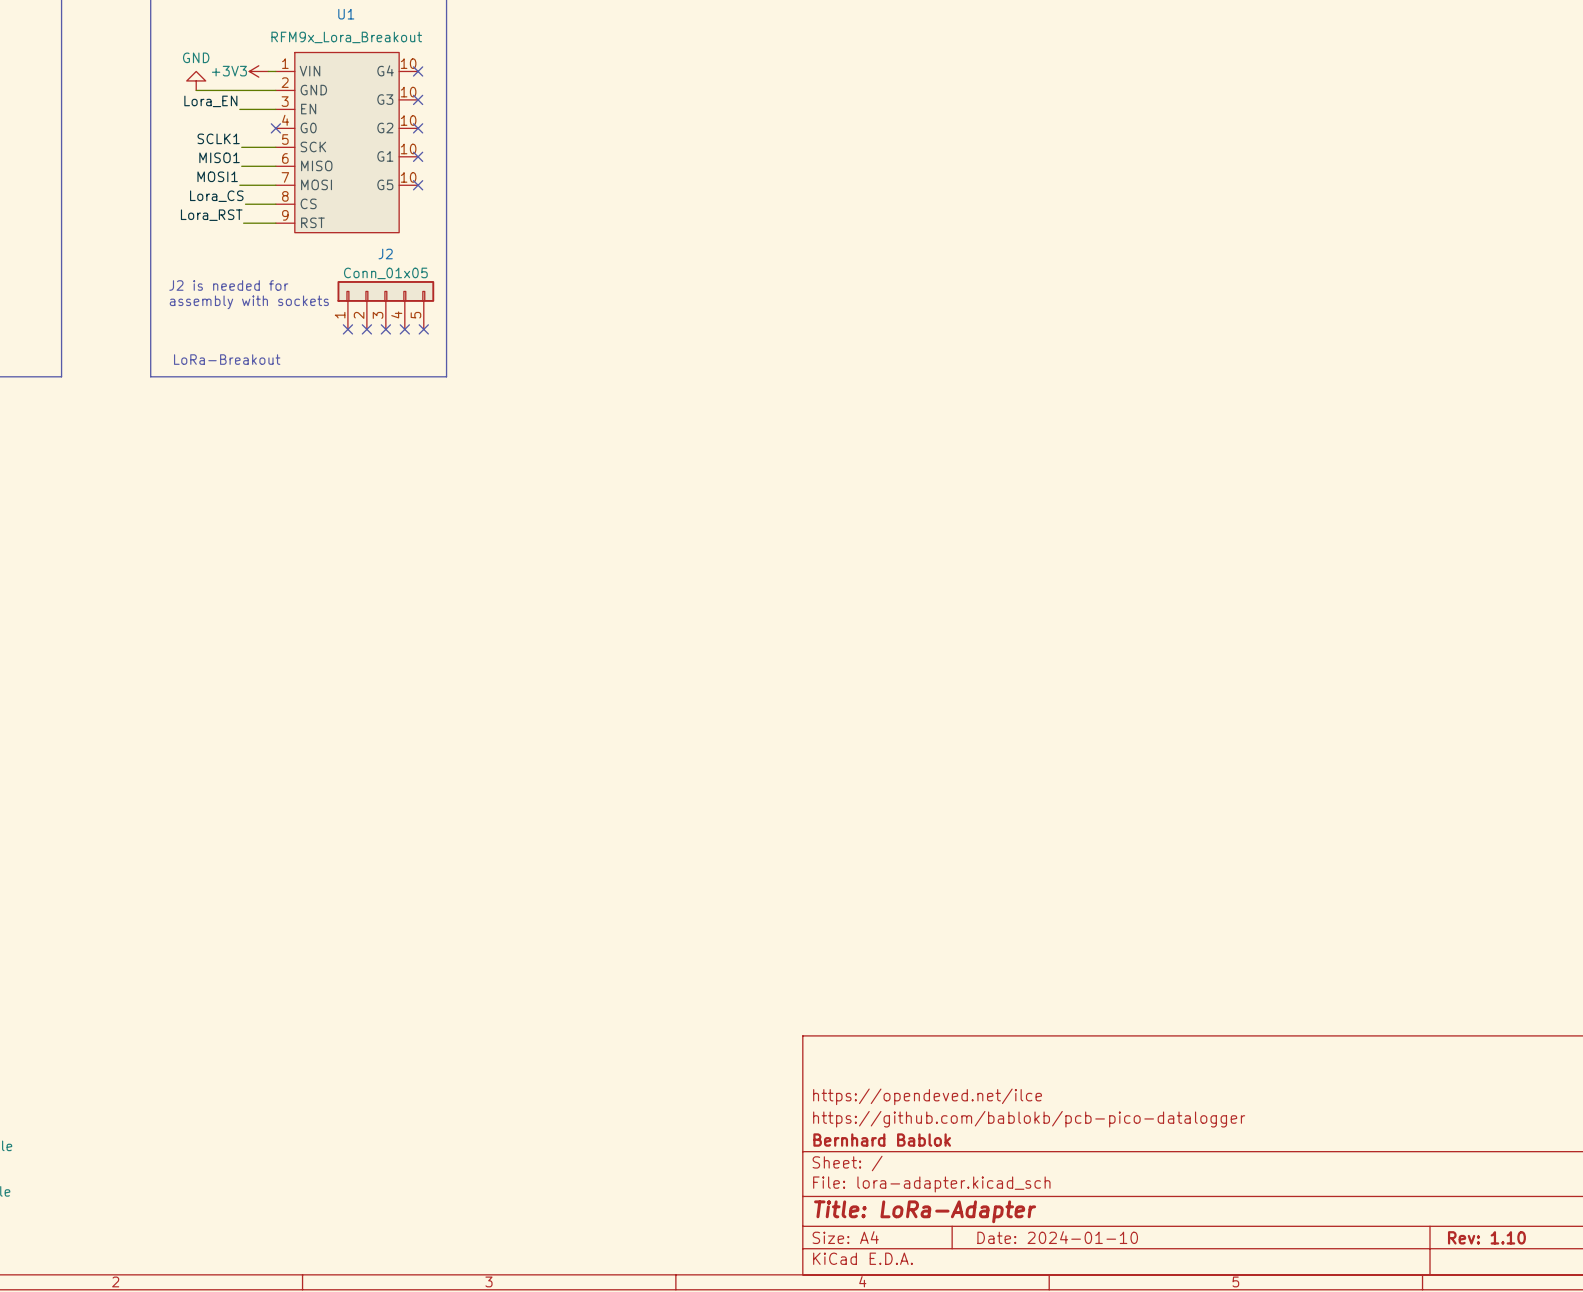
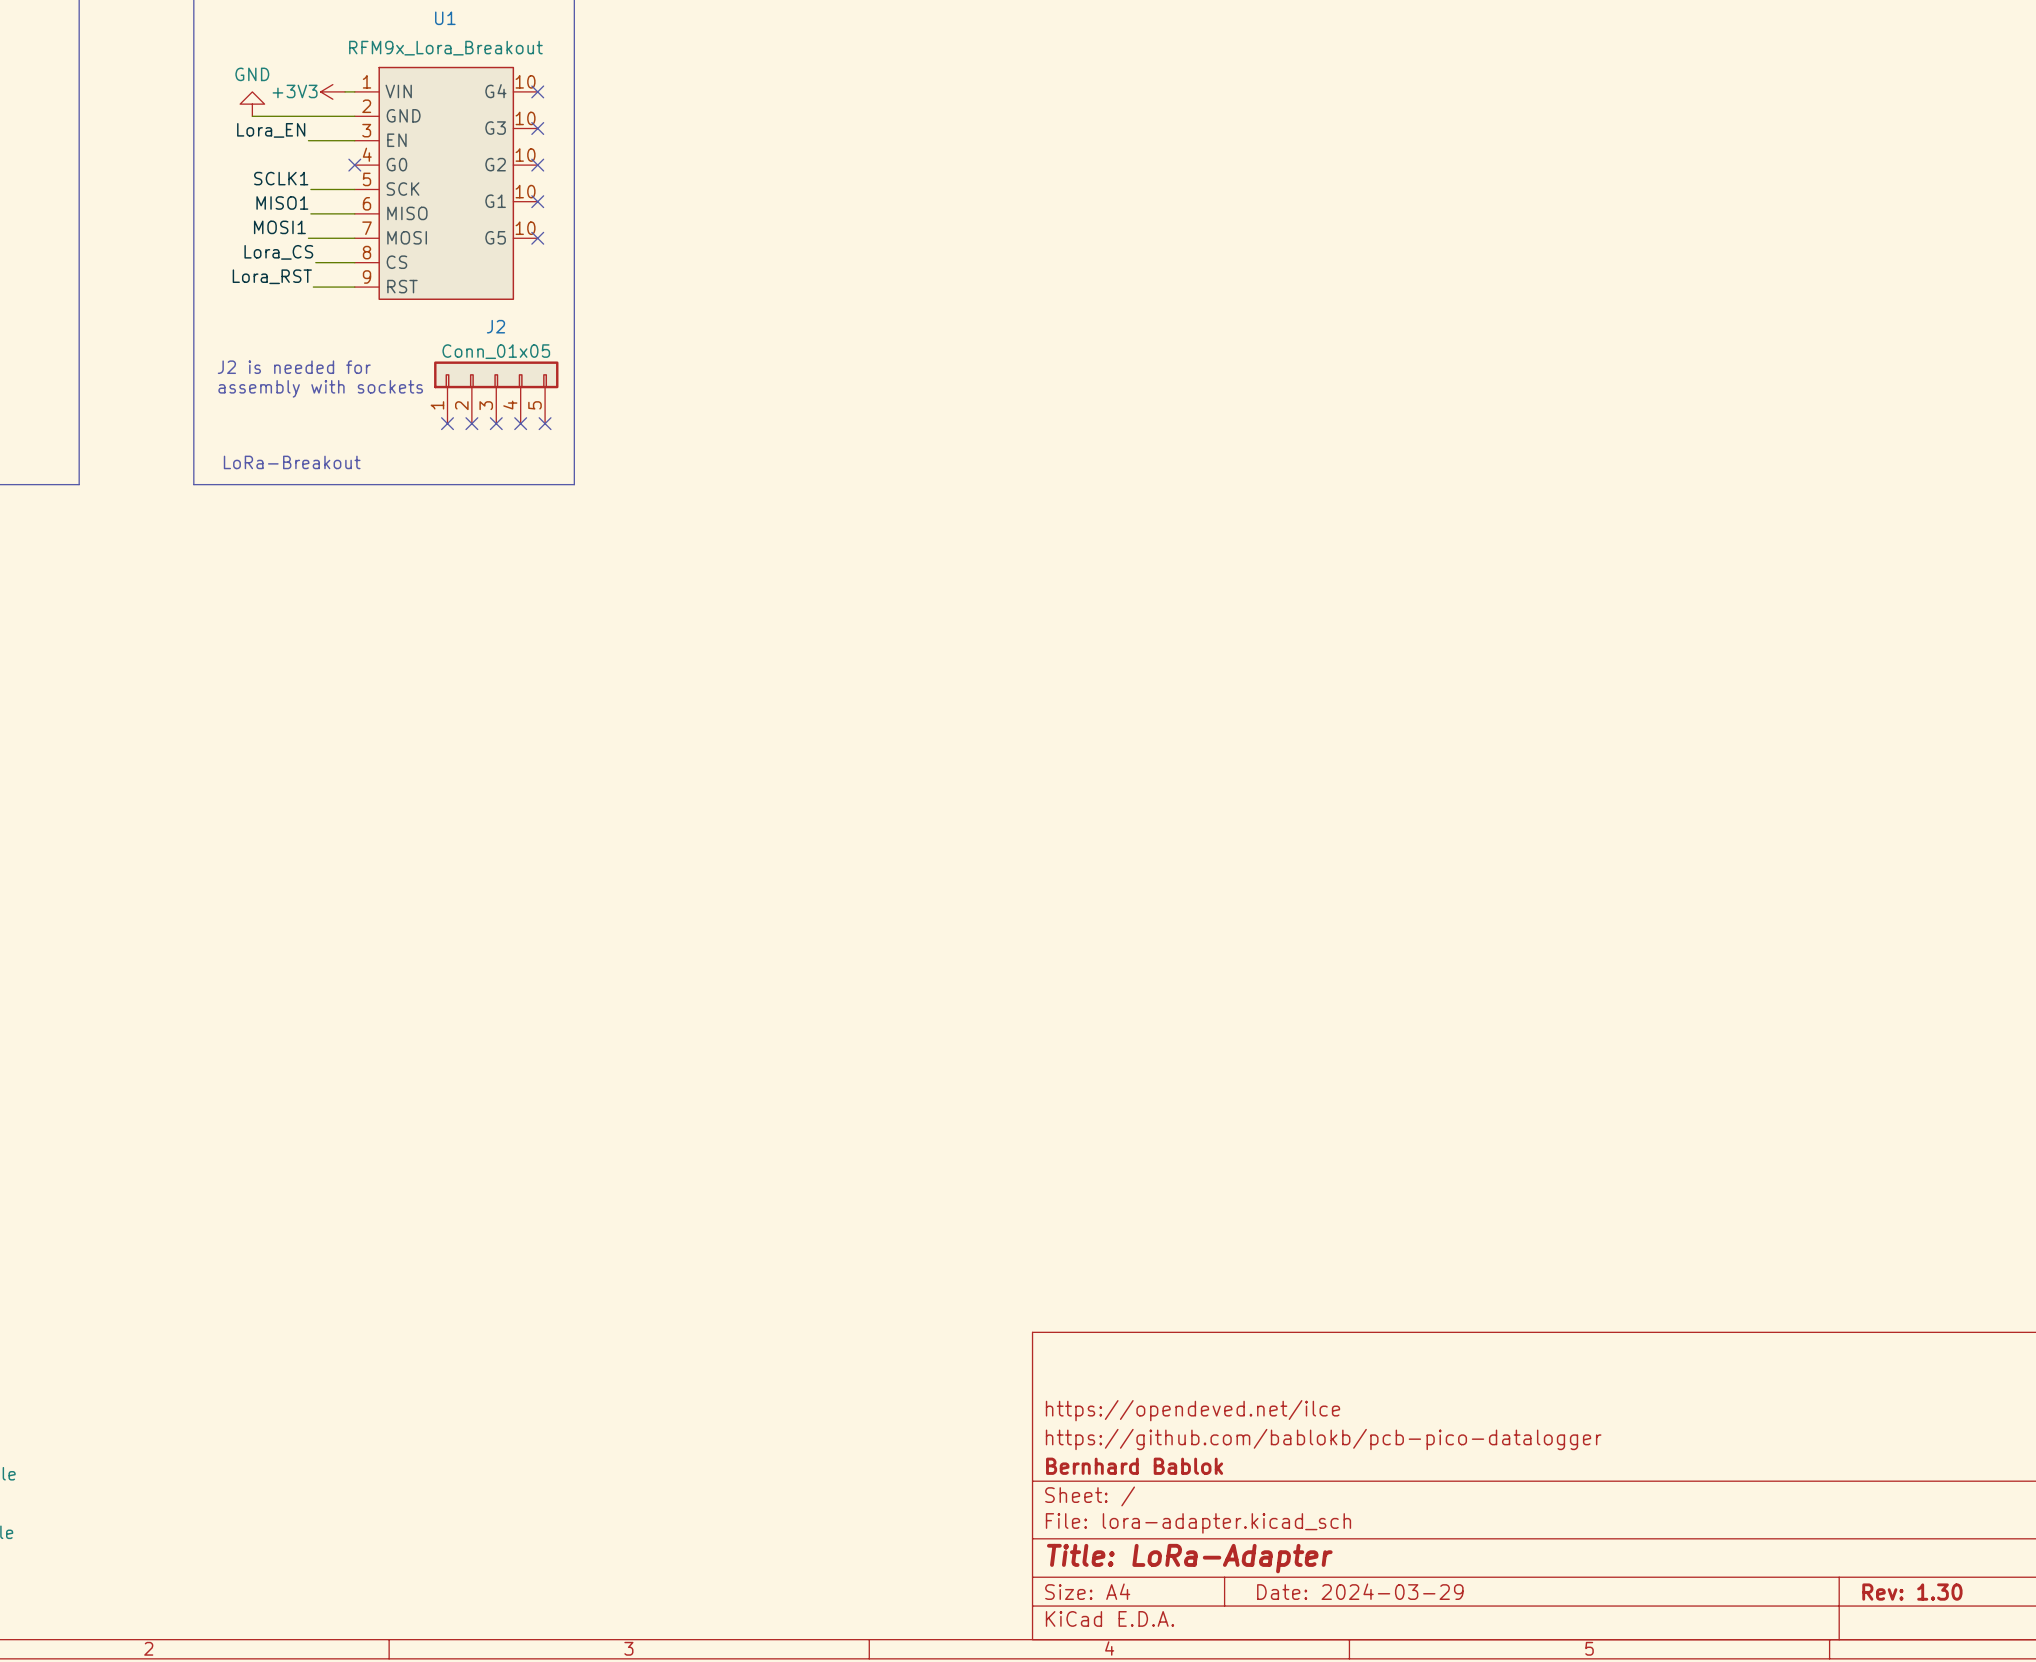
title block: Date: 2024-01-10 (1057, 1237) -> Date: 2024-03-29 (1360, 1591)
title block: Rev: 1.10 (1486, 1237) -> Rev: 1.30 (1912, 1592)

